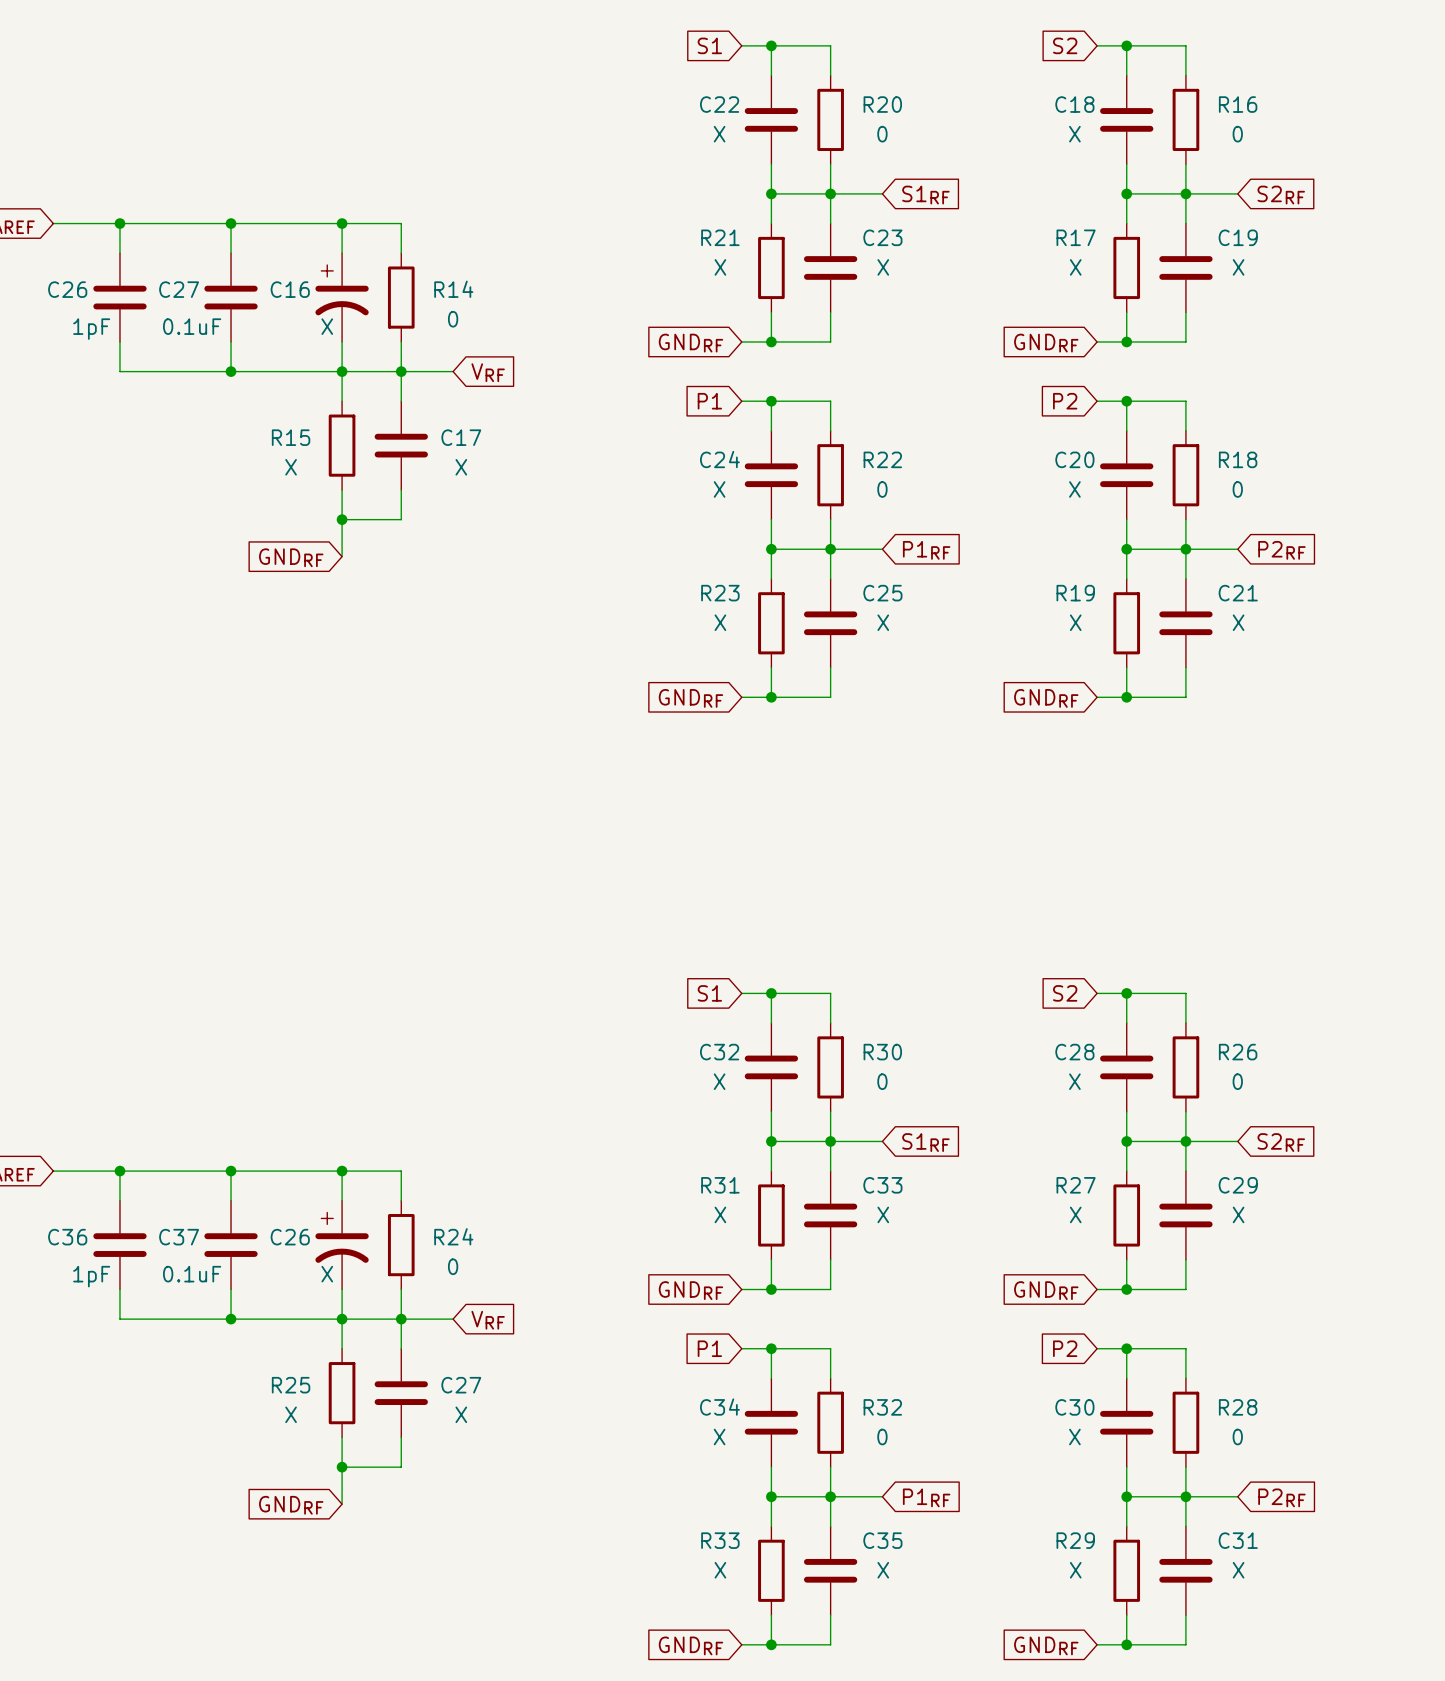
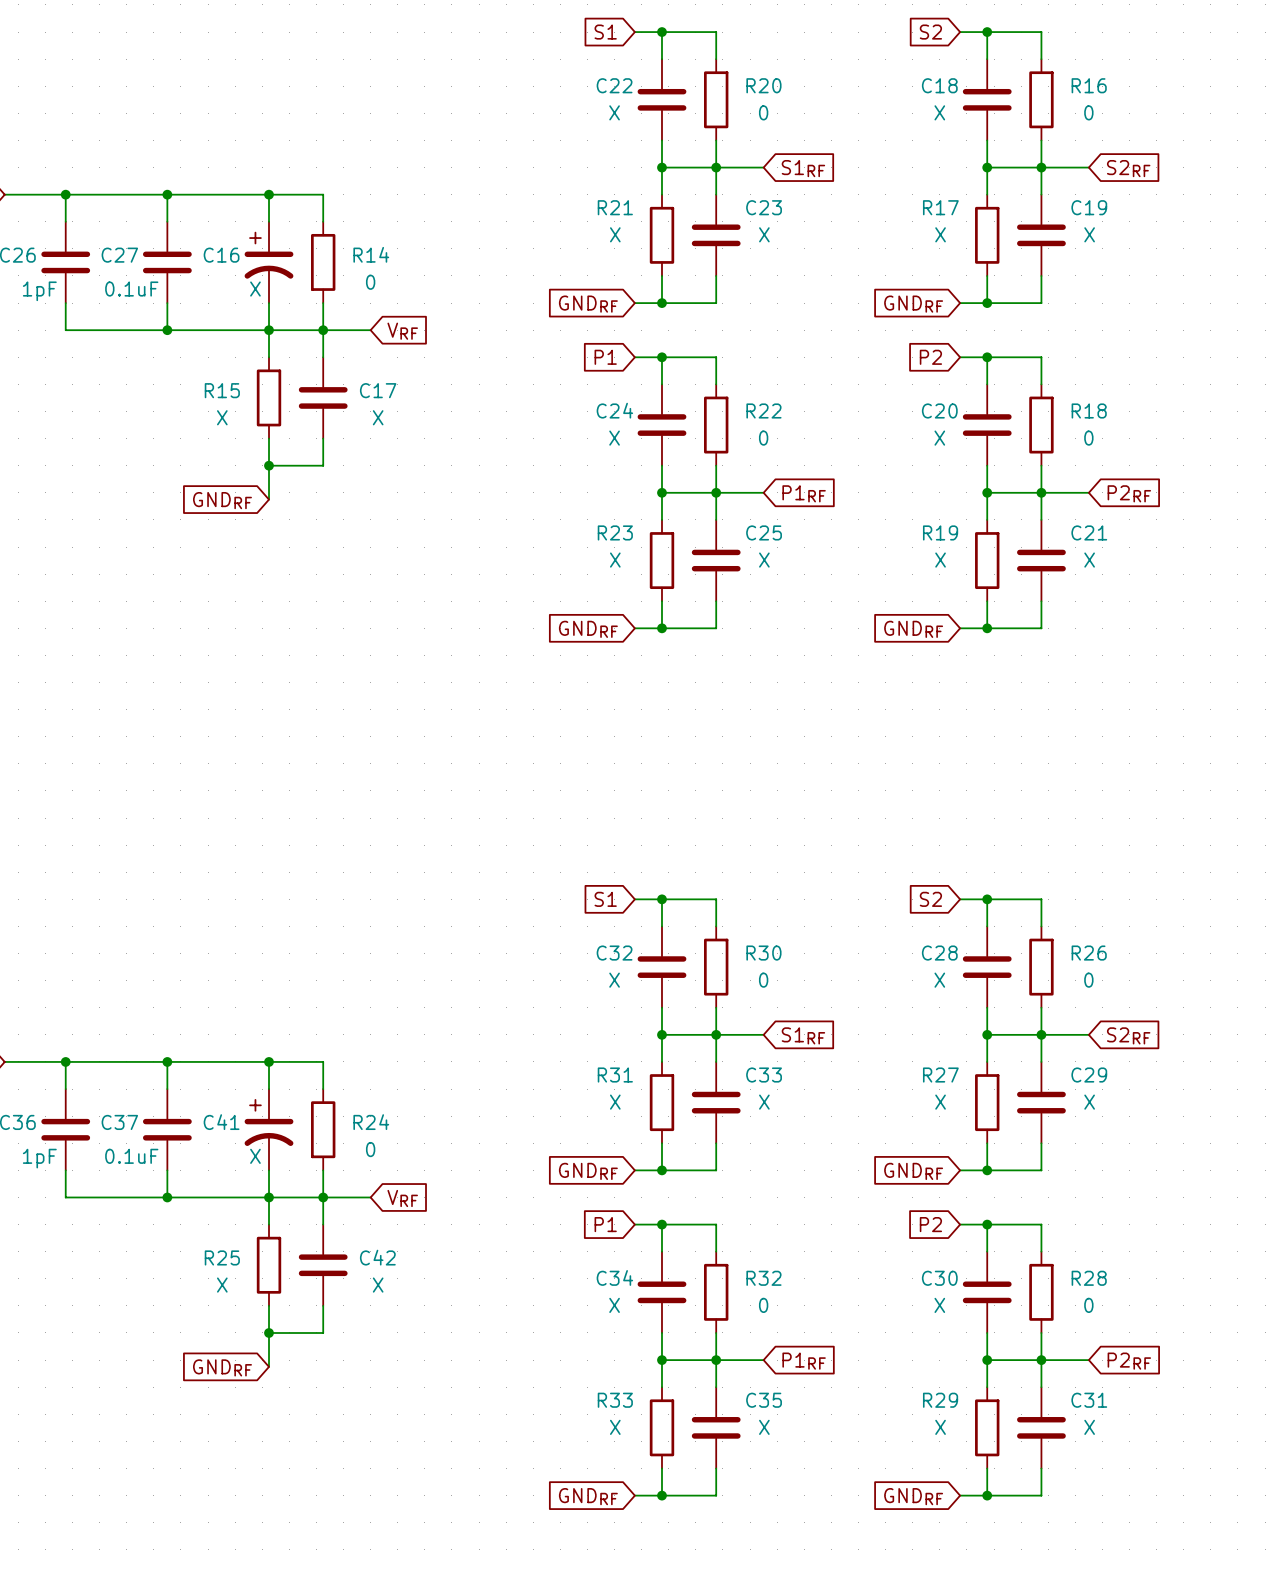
C26 name: C26 (290, 1237) -> C41 (221, 1122)
C27 name: C27 (461, 1385) -> C42 (377, 1257)

